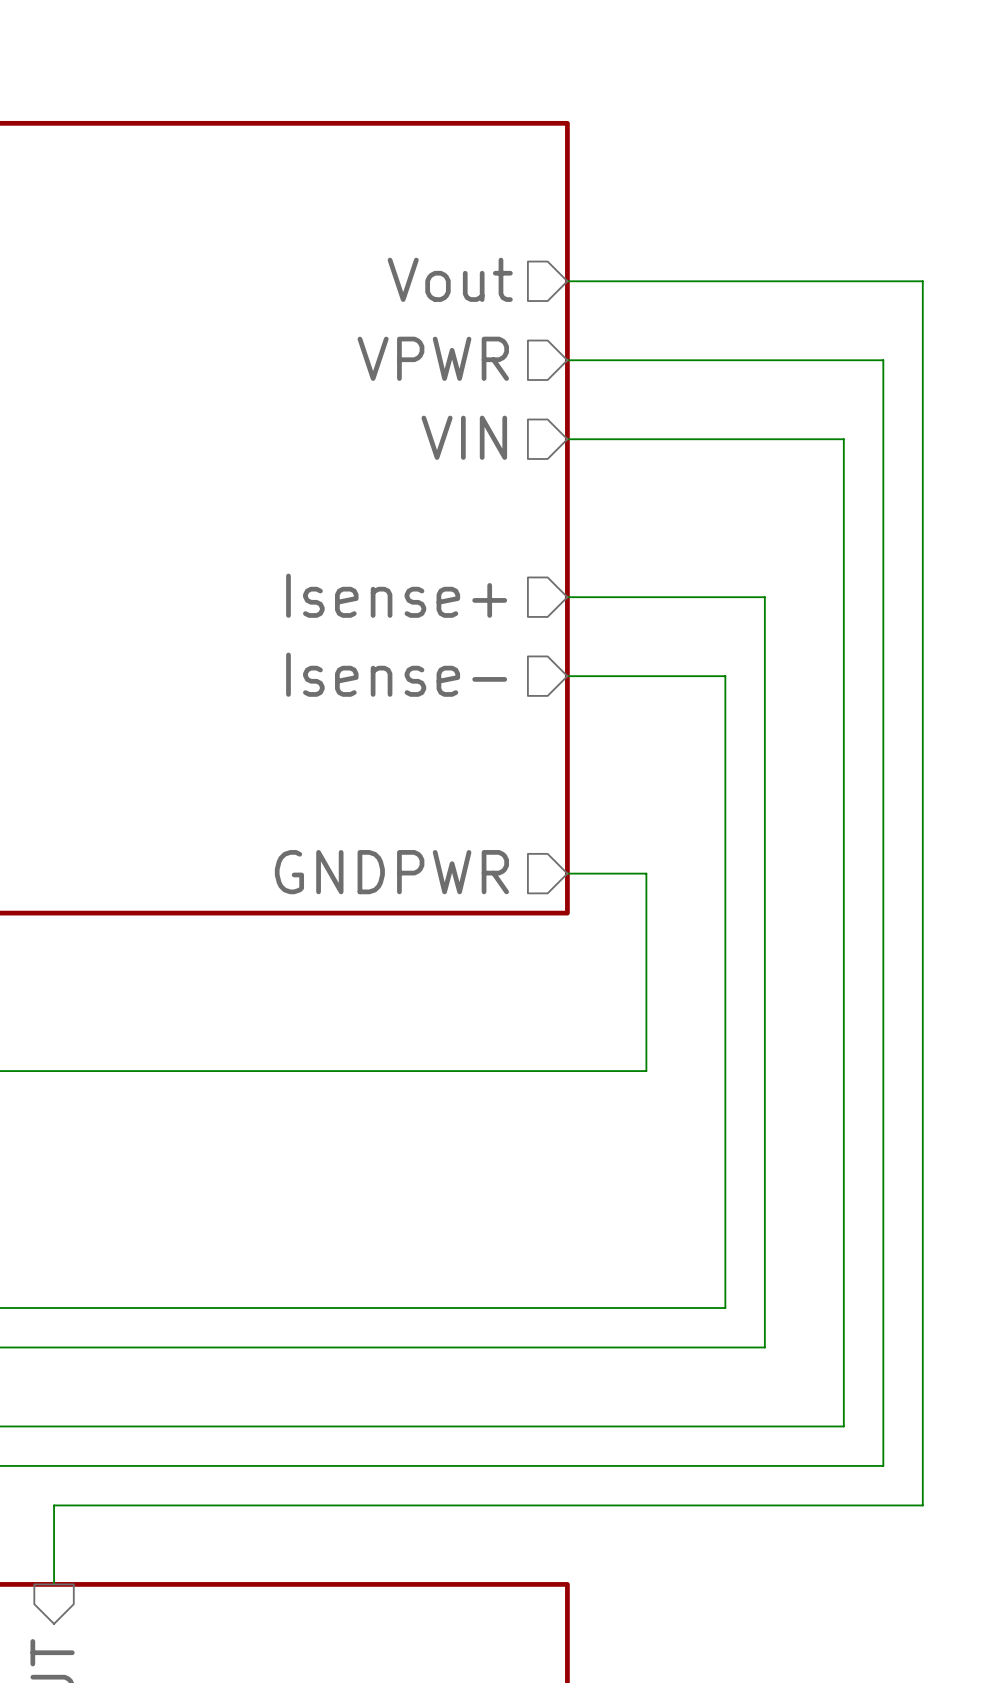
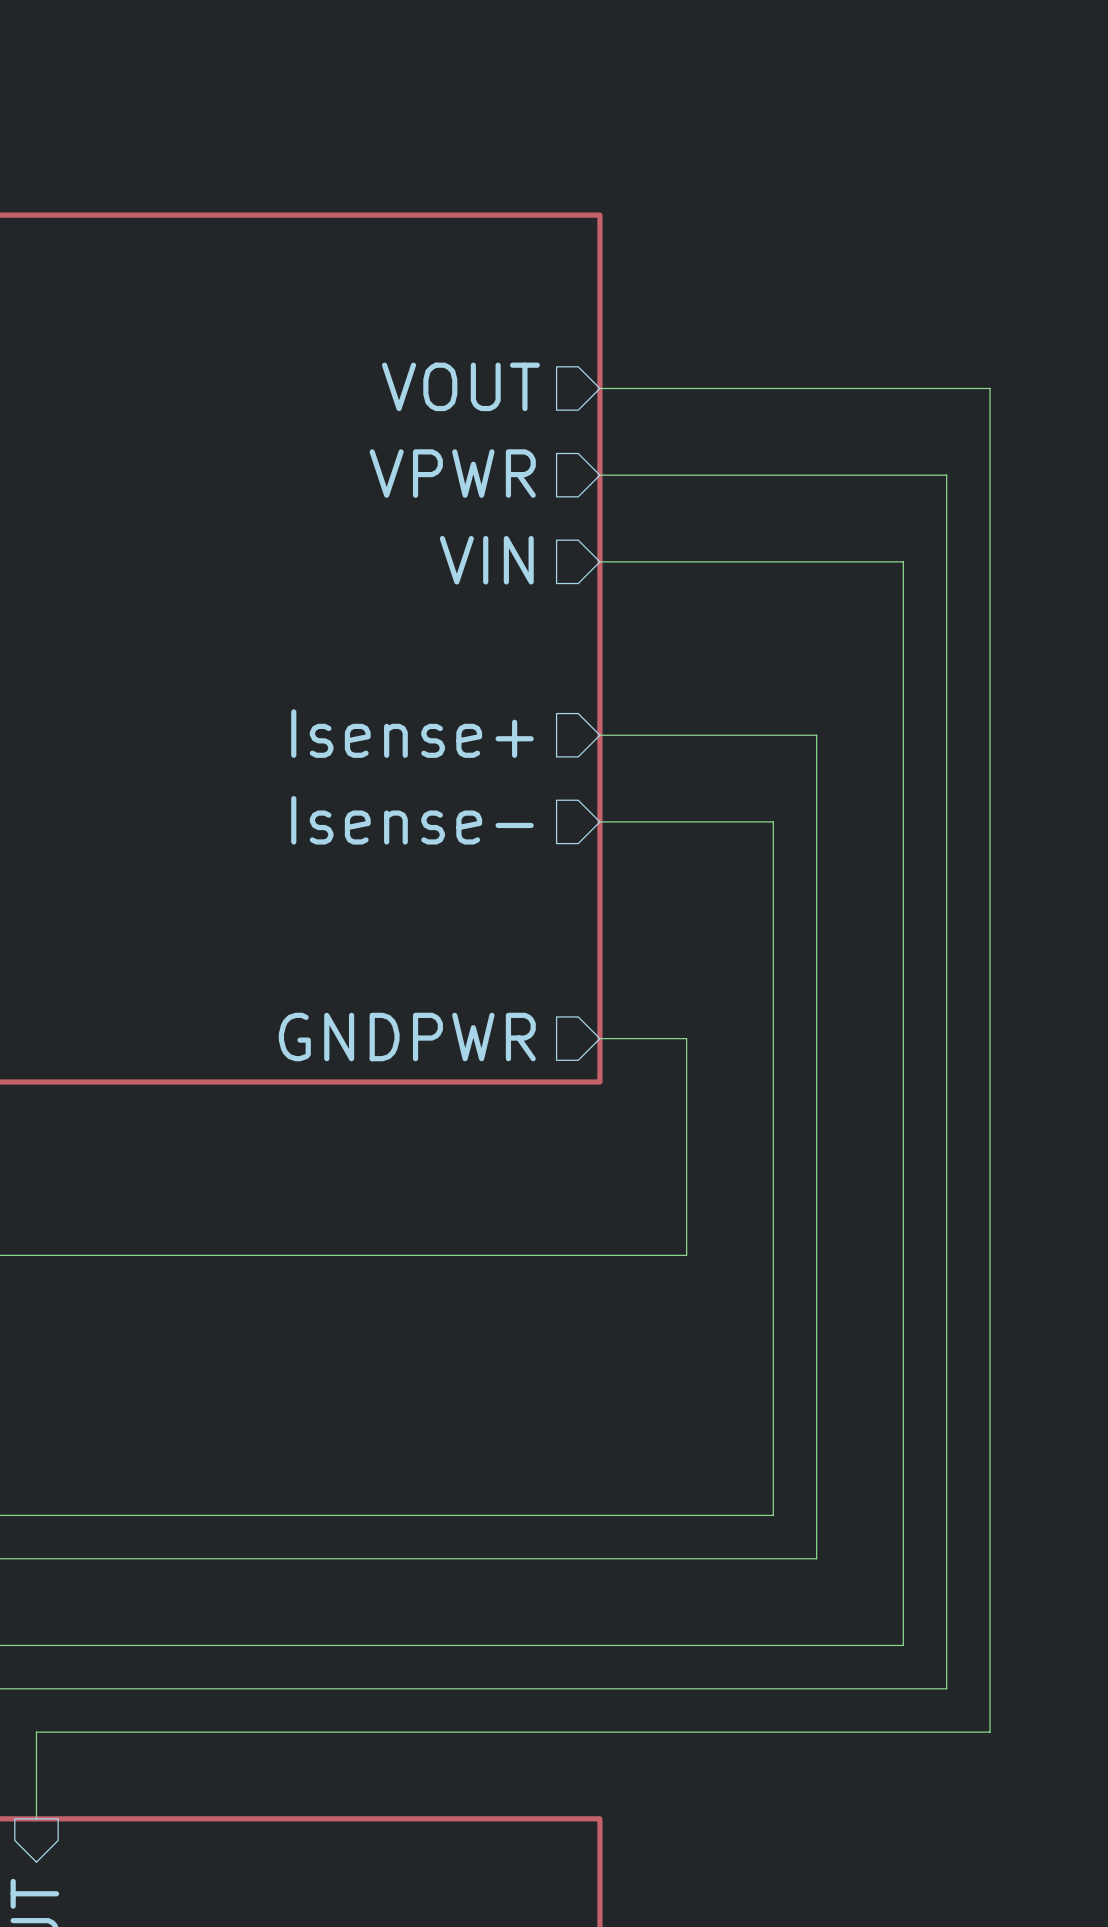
sheet pin: Vout (450, 279) -> VOUT (460, 386)

